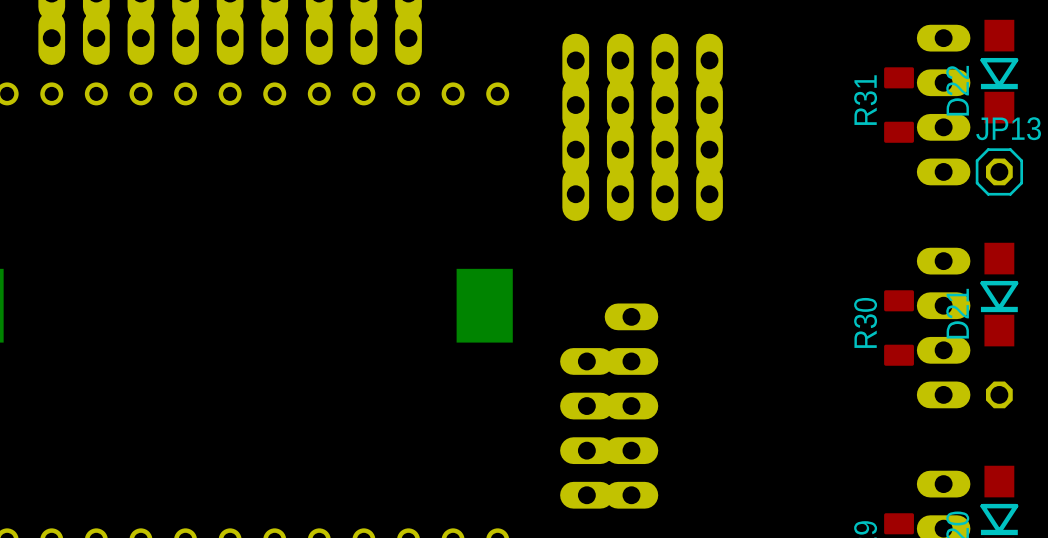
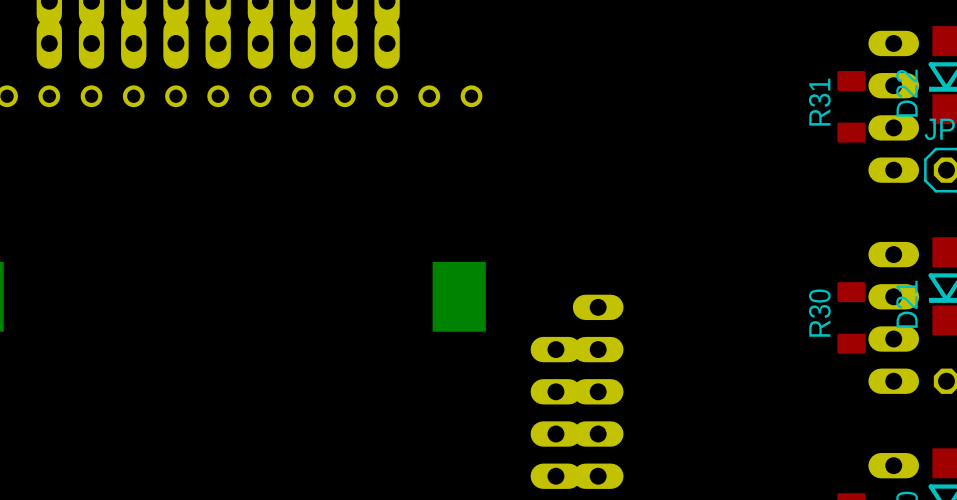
part: (642, 60) -> none
part: (642, 105) -> none
part: (642, 149) -> none
part: (642, 194) -> none

